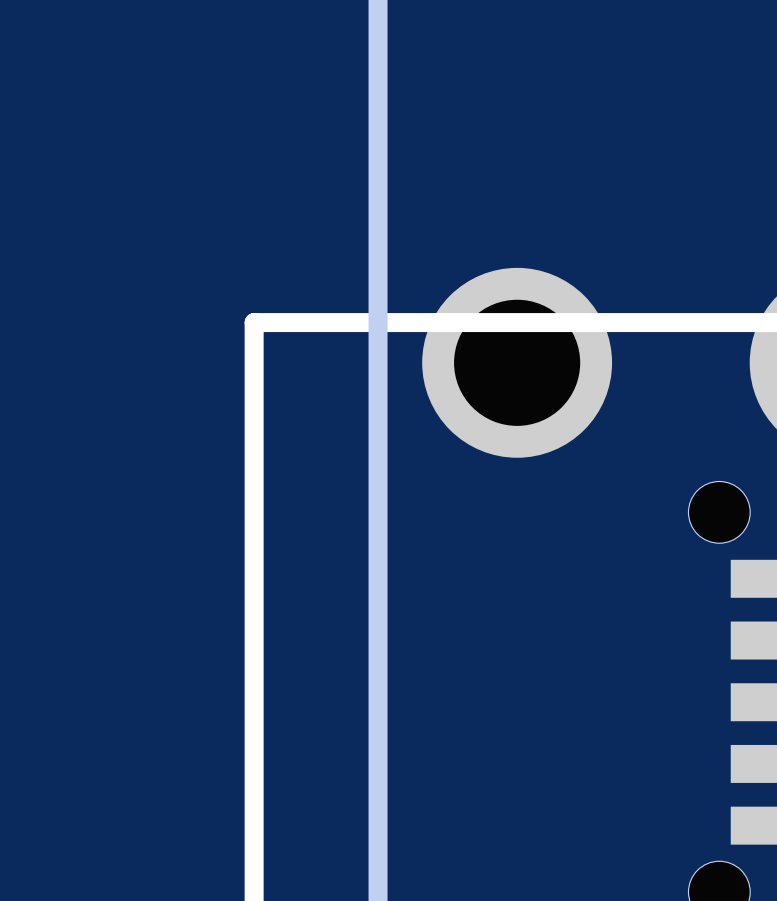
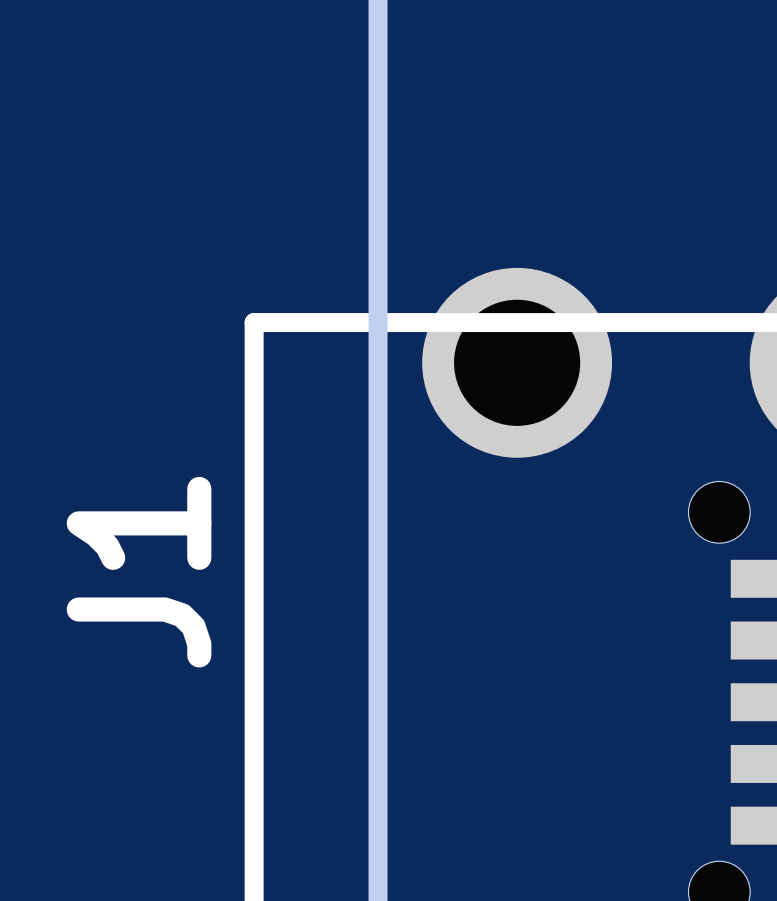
J1 name: none -> J1 (139, 572)

